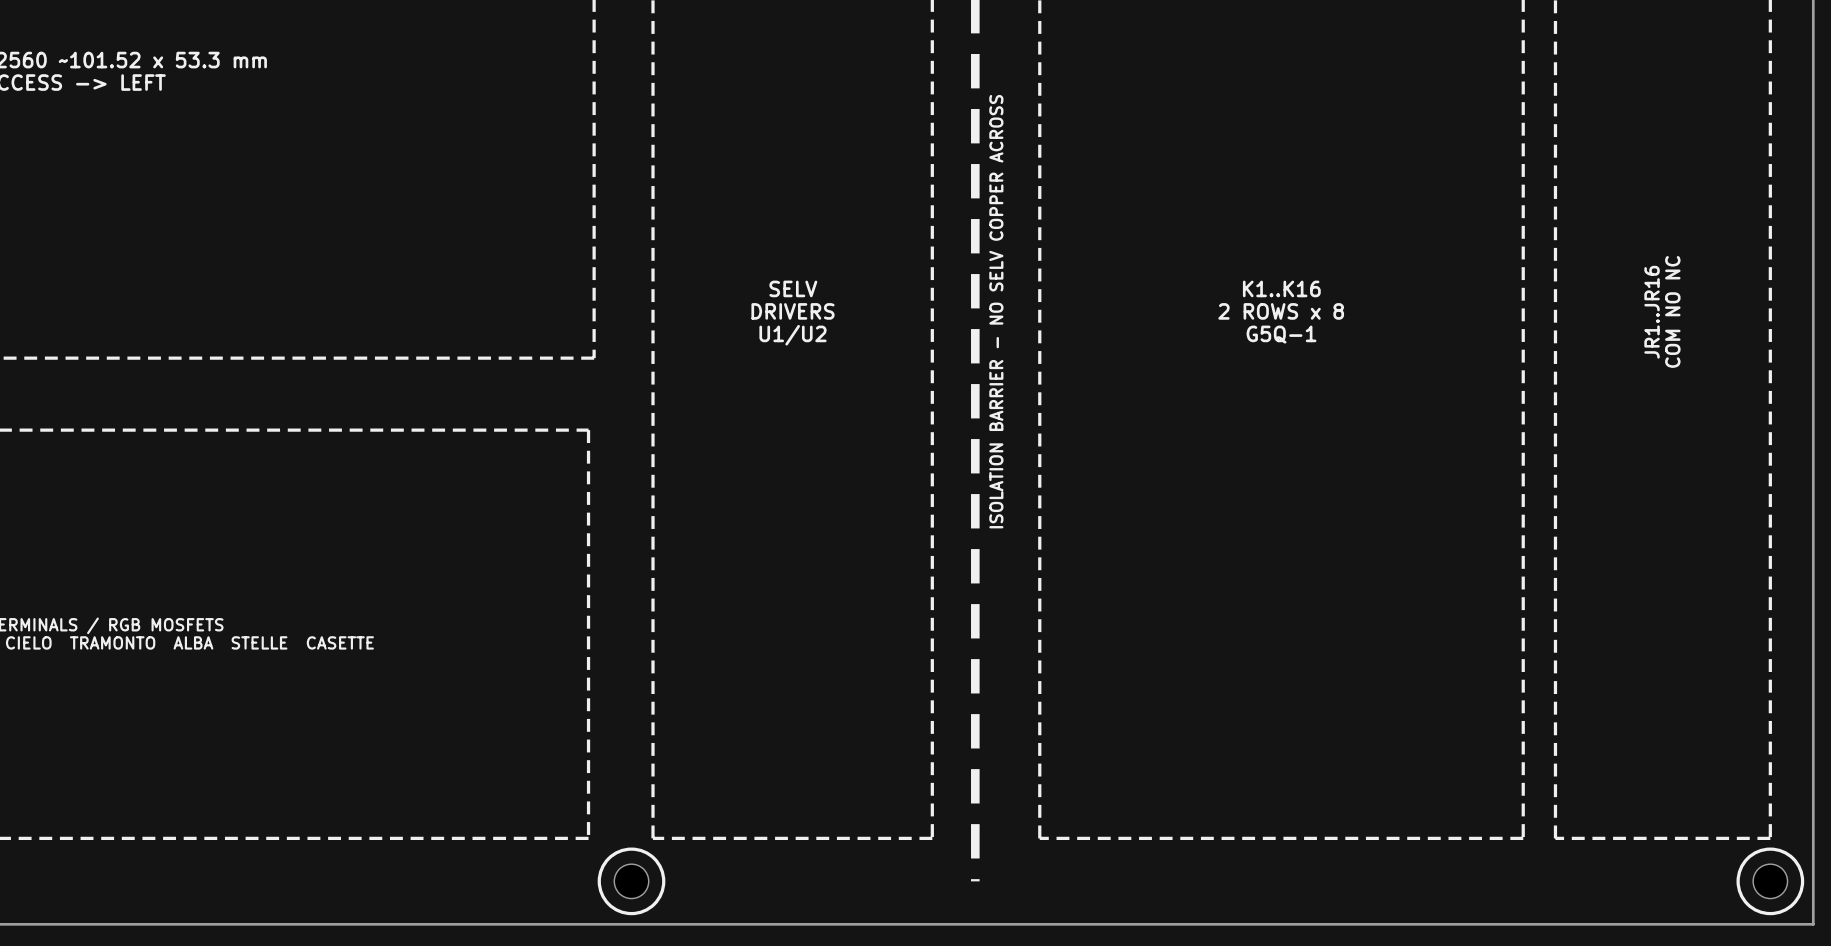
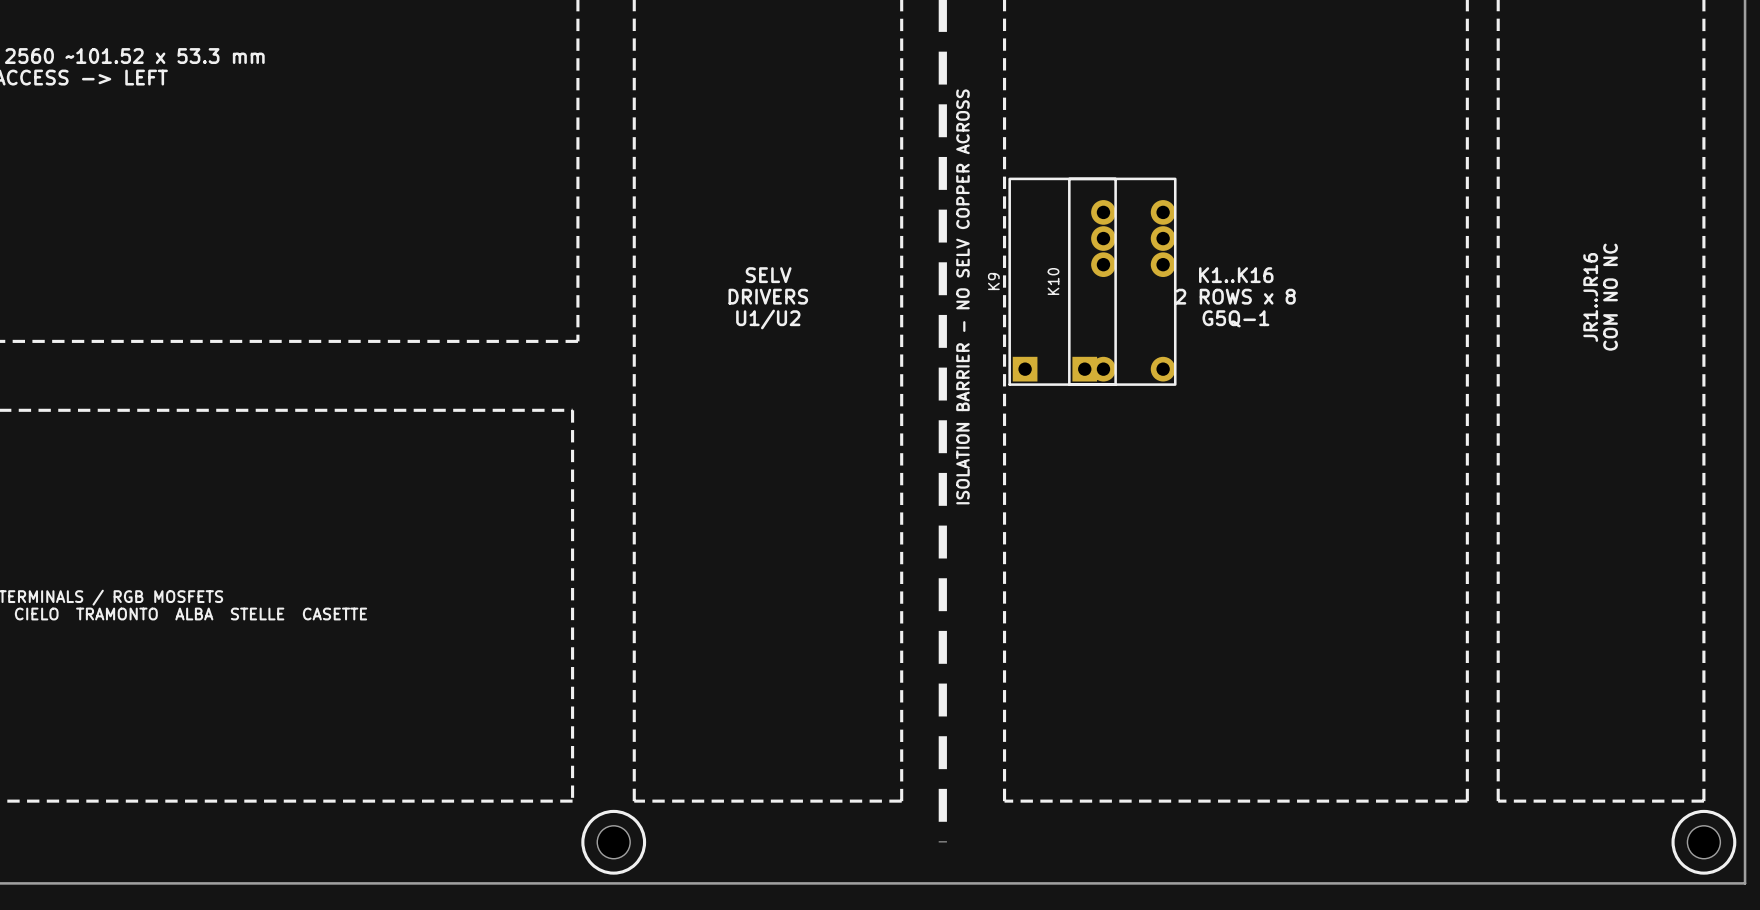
K9: none -> (1062, 281)
K10: none -> (1122, 281)

